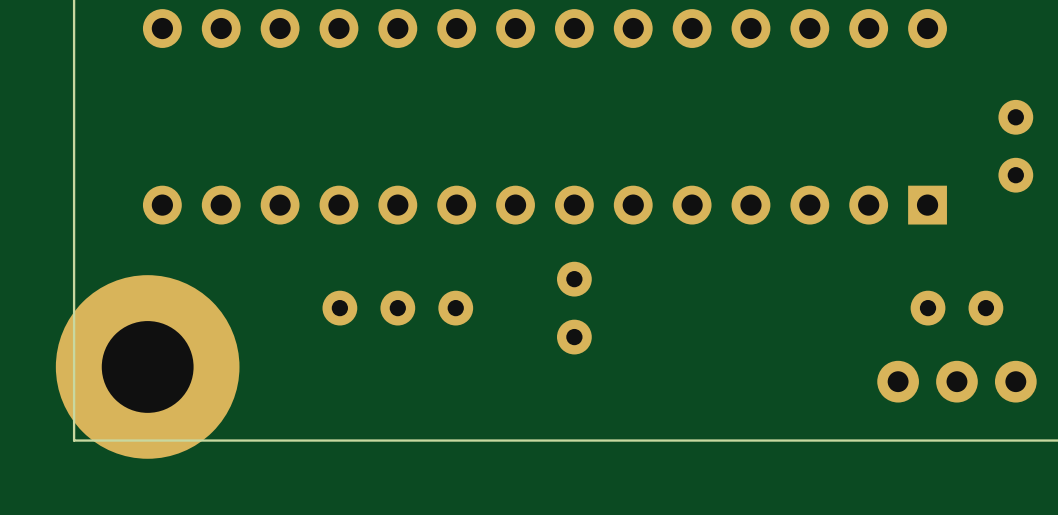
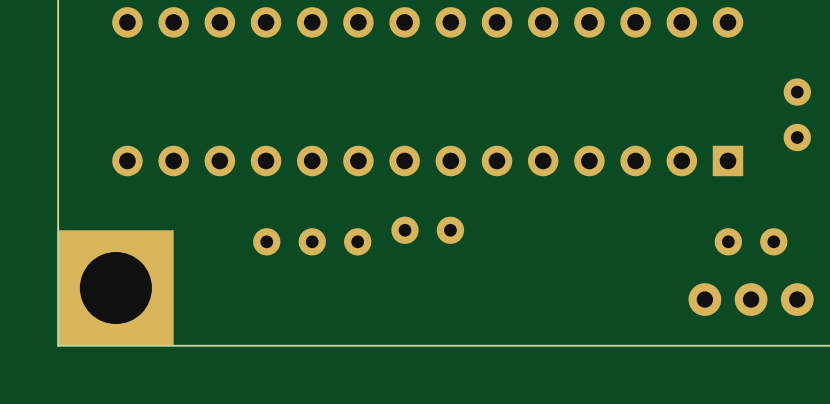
part footprint: [55, 275, 240, 459] -> [58, 230, 174, 346]
part rotation: 0° (574, 308) -> 90° clockwise (427, 230)

